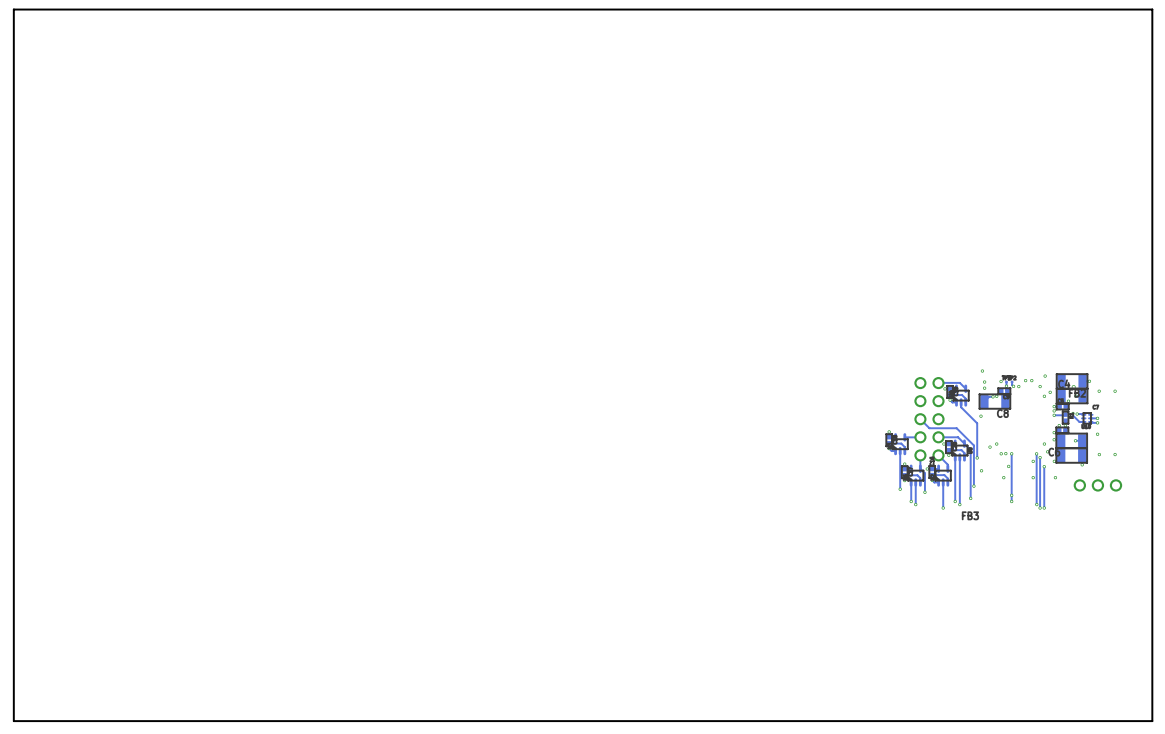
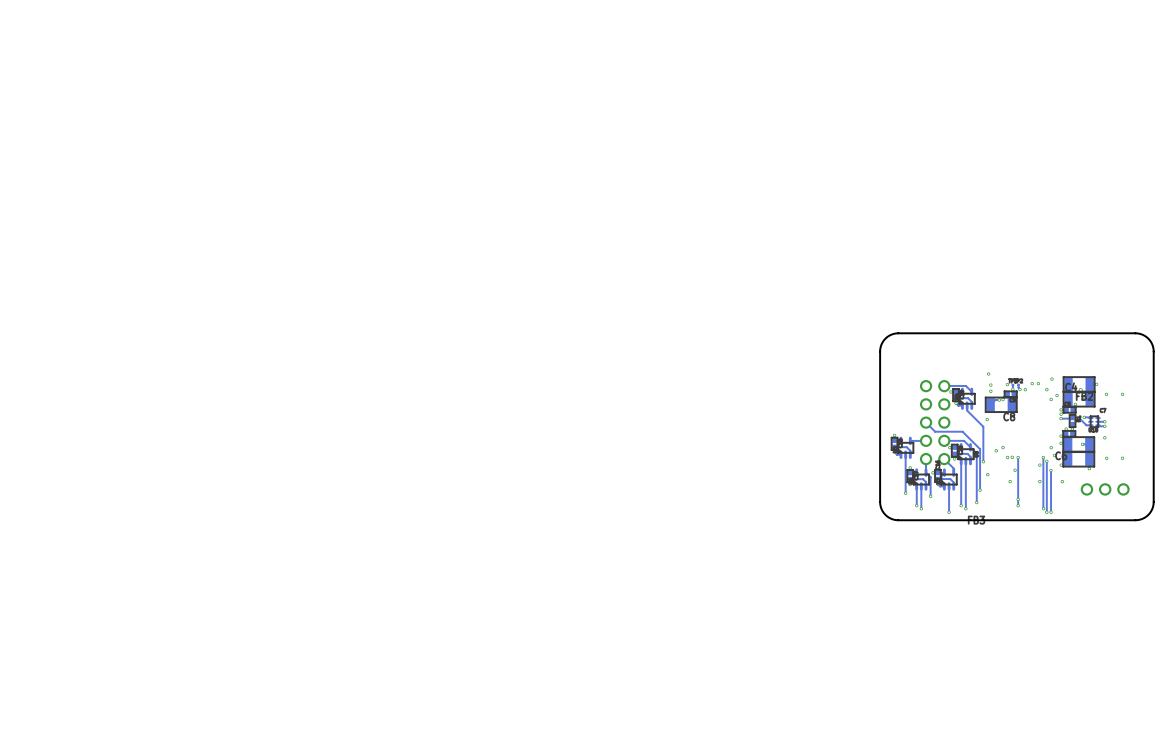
board edge: (1152, 9) (13, 9) (13, 721) (1152, 721) (1152, 9) -> none
board edge: none -> (1135, 333) (898, 333) (887, 337) (881, 344) (880, 351) (880, 502) (883, 513) (891, 518) (898, 520) (1135, 520) (1146, 516) (1152, 508) (1153, 502) (1153, 351) (1148, 338) (1135, 333)

